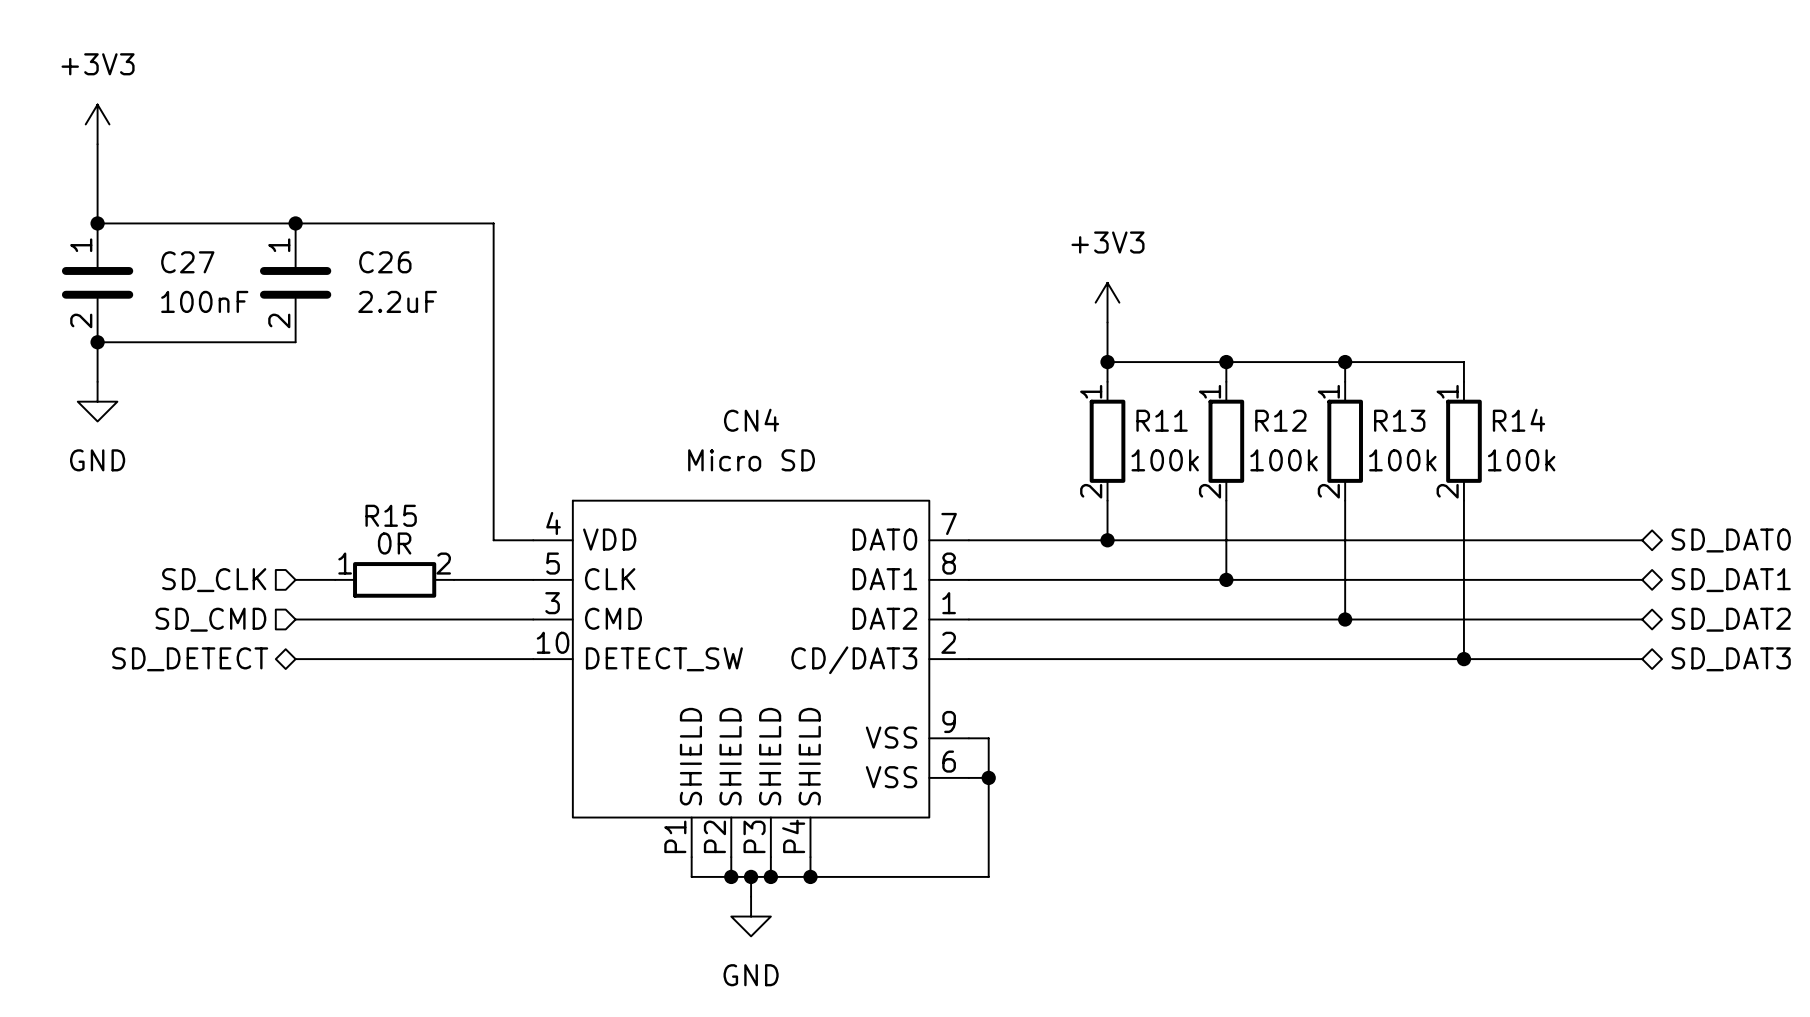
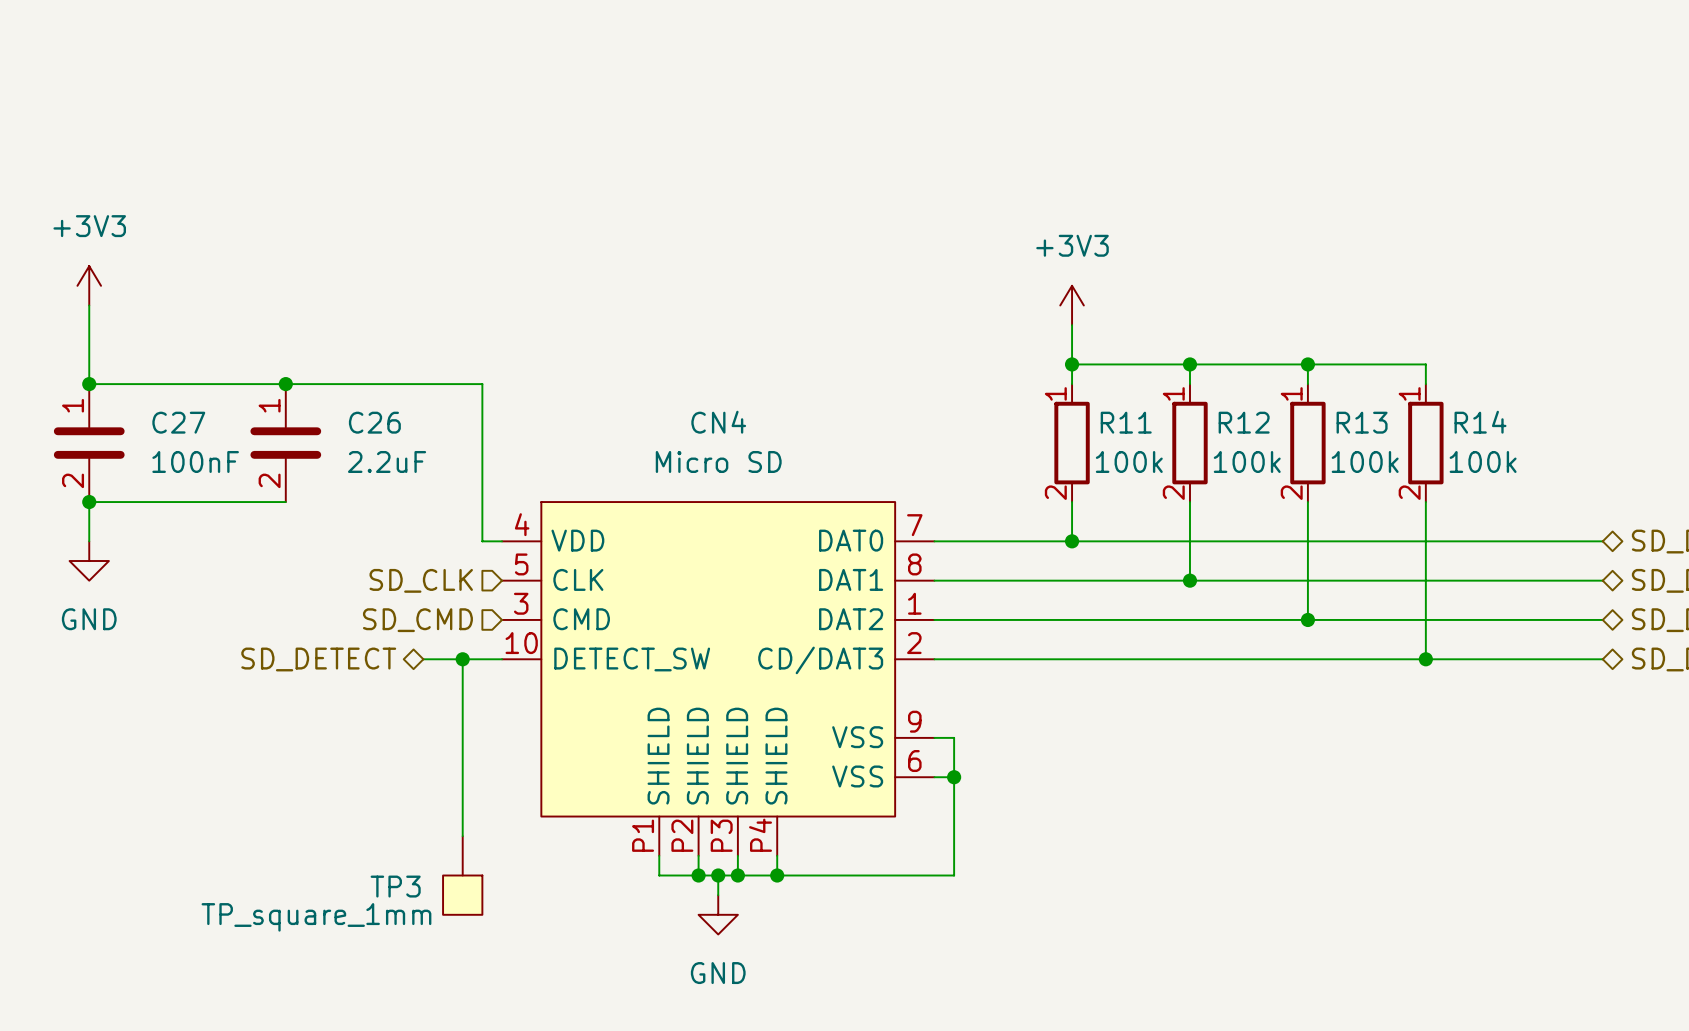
power symbol position: +3V3 (97, 124) -> +3V3 (89, 285)
wire: (97, 144) (97, 223) (493, 223) (493, 540) (513, 540) -> (89, 305) (89, 384) (482, 384) (482, 541)
junction: (97, 223) -> none
junction: (295, 223) -> none
C27 position: (97, 282) -> (89, 443)
C26 position: (295, 282) -> (285, 443)
junction position: (97, 342) -> (89, 384)
wire: (295, 342) (97, 342) (97, 381) -> (285, 502) (89, 502) (89, 541)
junction: none -> (285, 384)
power symbol position: GND (97, 401) -> GND (89, 561)
junction: none -> (89, 502)
wire: (295, 579) (335, 579) -> none
R15: (394, 579) -> none
wire: (454, 579) (533, 579) -> none
hierarchical label position: SD_CLK (214, 580) -> SD_CLK (421, 580)
hierarchical label position: SD_CMD (210, 619) -> SD_CMD (417, 620)
wire: (295, 619) (533, 619) -> none
hierarchical label position: SD_DETECT (190, 659) -> SD_DETECT (318, 659)
wire: (295, 659) (454, 659) -> none
wire: none -> (462, 659) (462, 836)
junction: none -> (462, 659)
TP3: none -> TP_square_1mm (462, 875)

